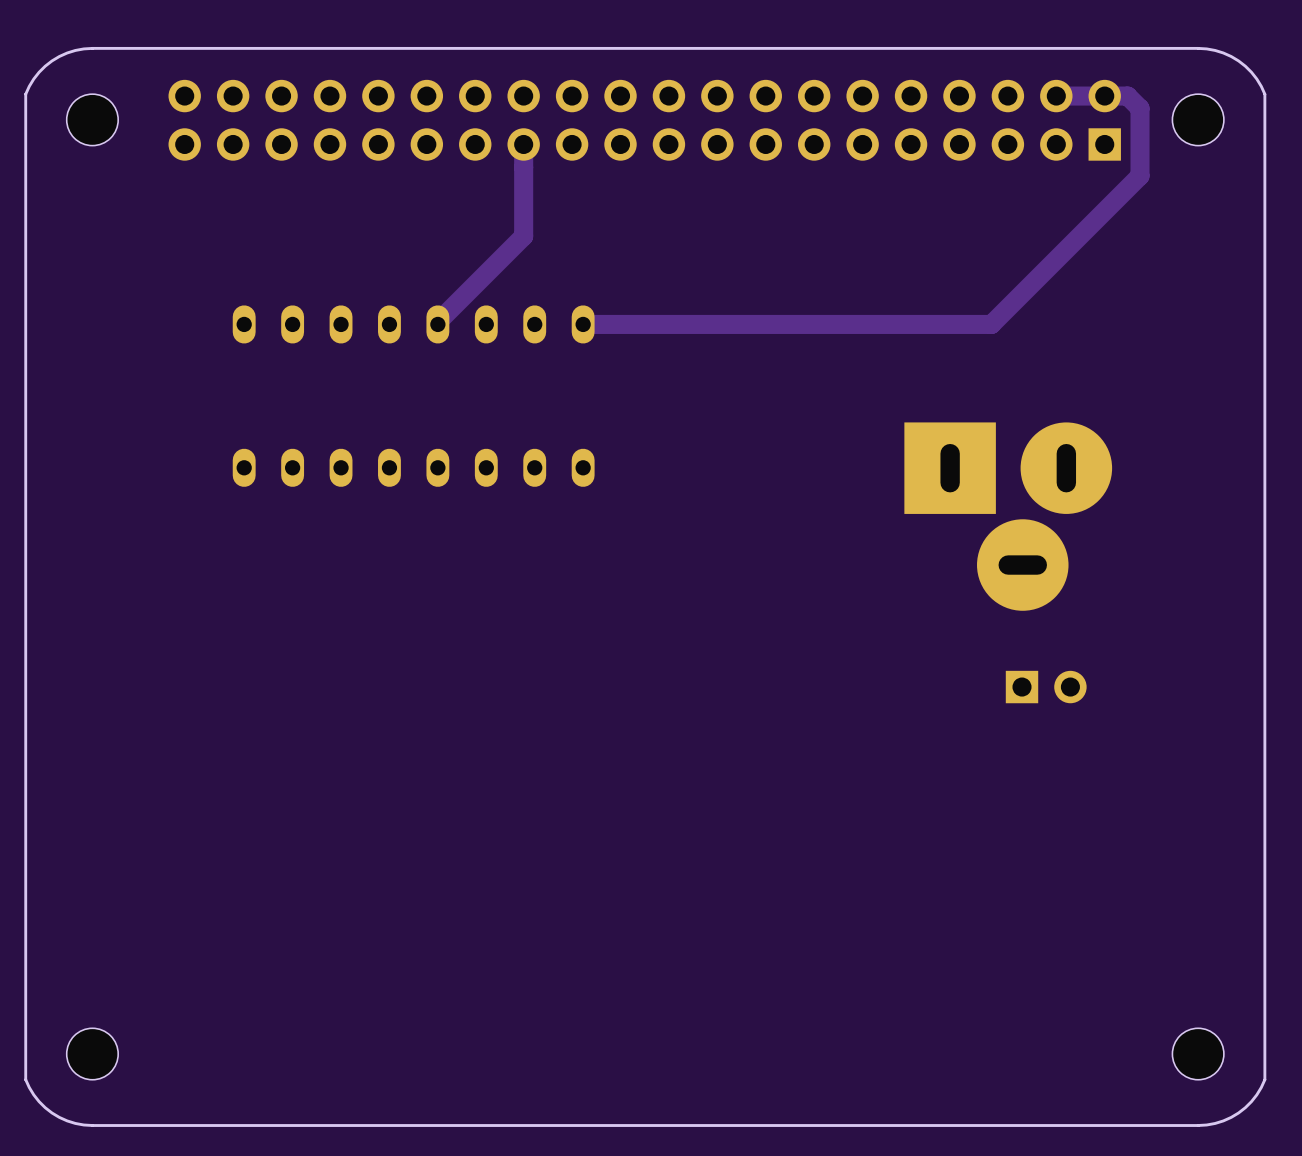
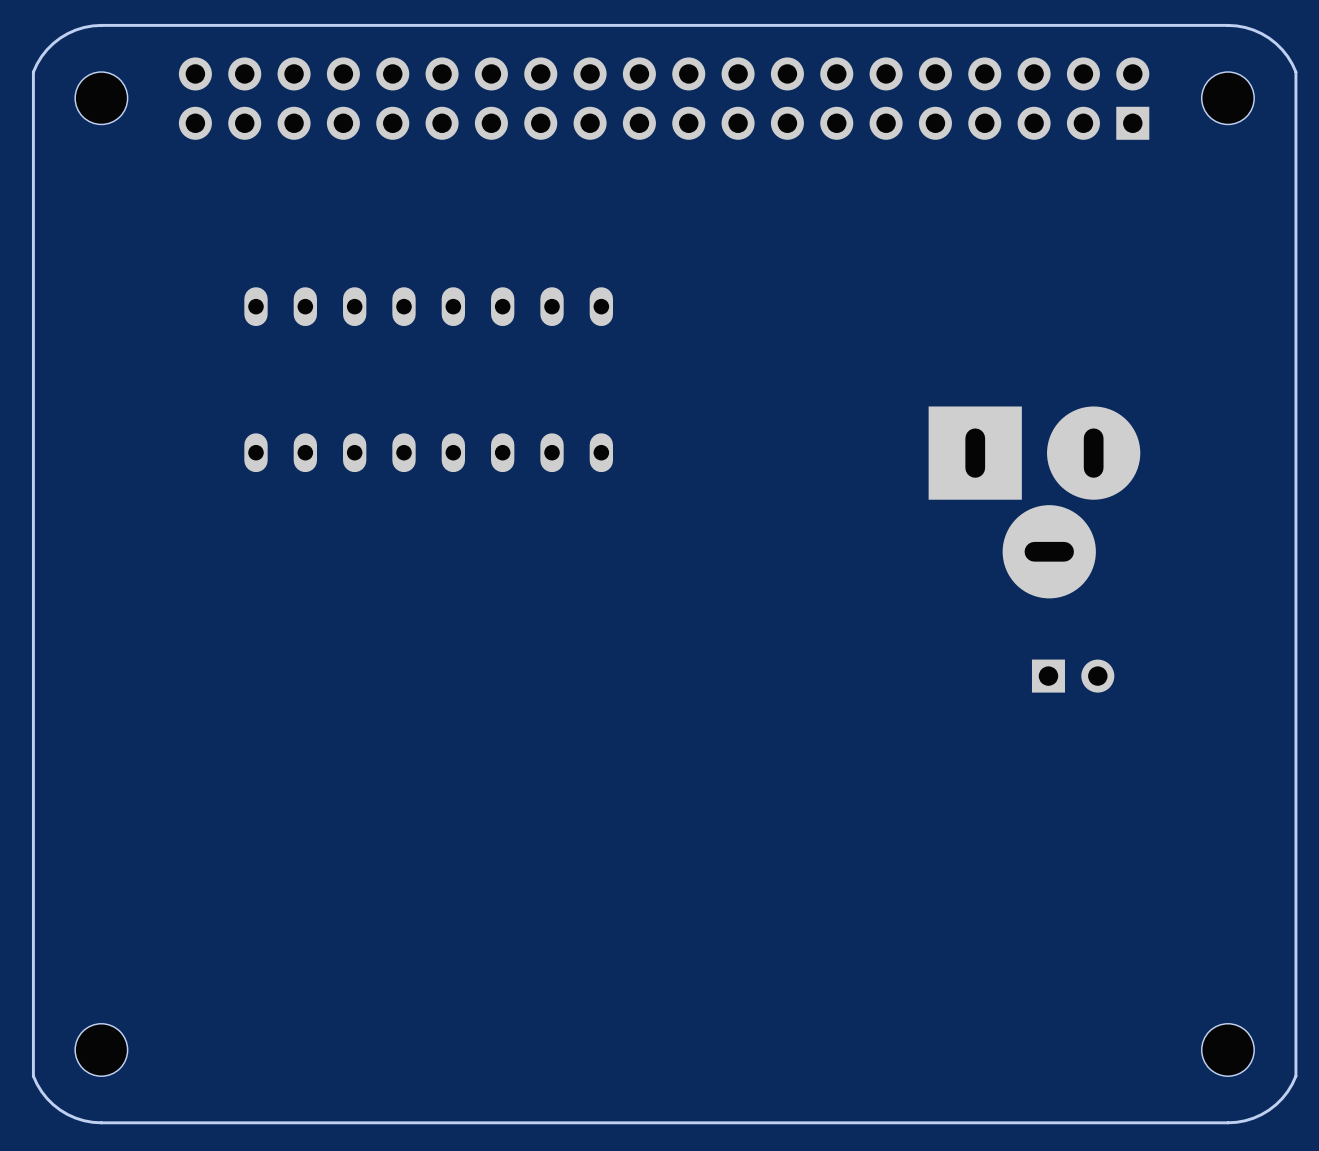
track: (1056, 96) (1127, 96) (1140, 108) (1140, 175) (991, 324) (583, 324) -> none
track: (523, 144) (523, 236) (437, 322) (437, 324) -> none

